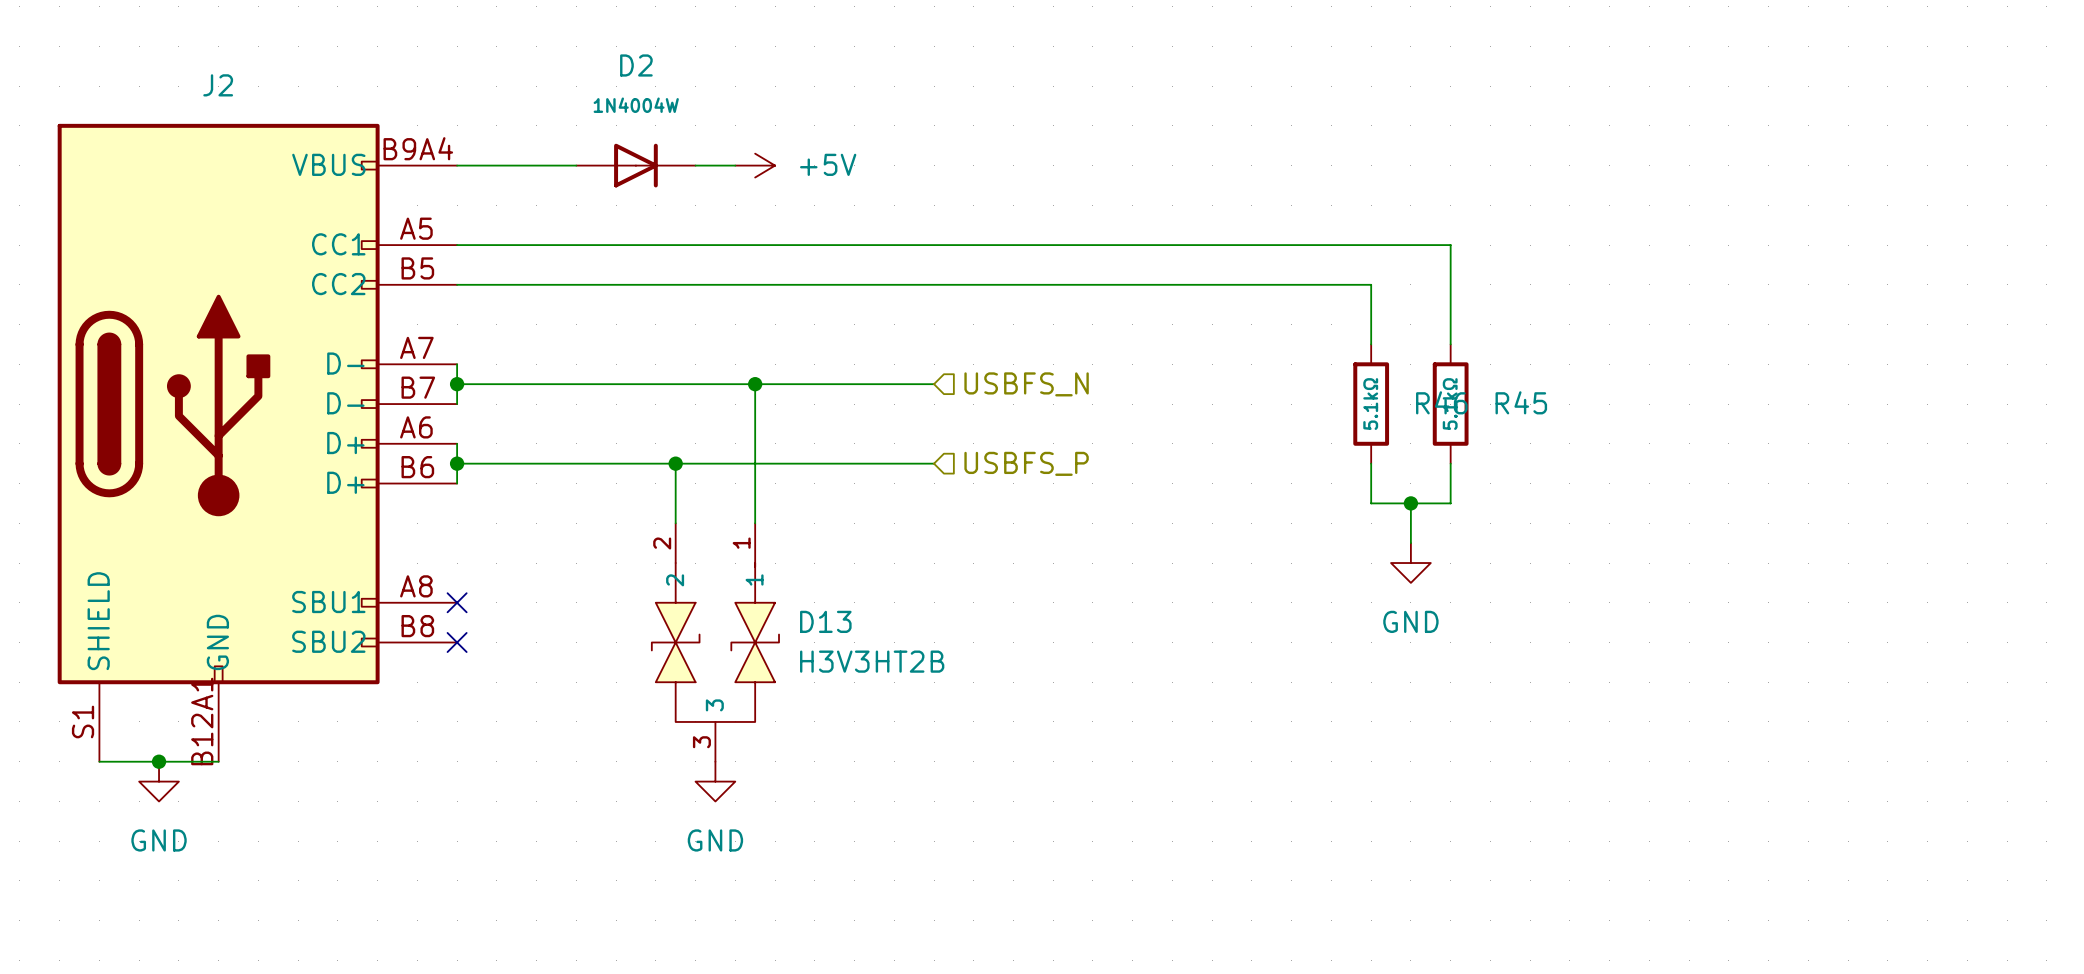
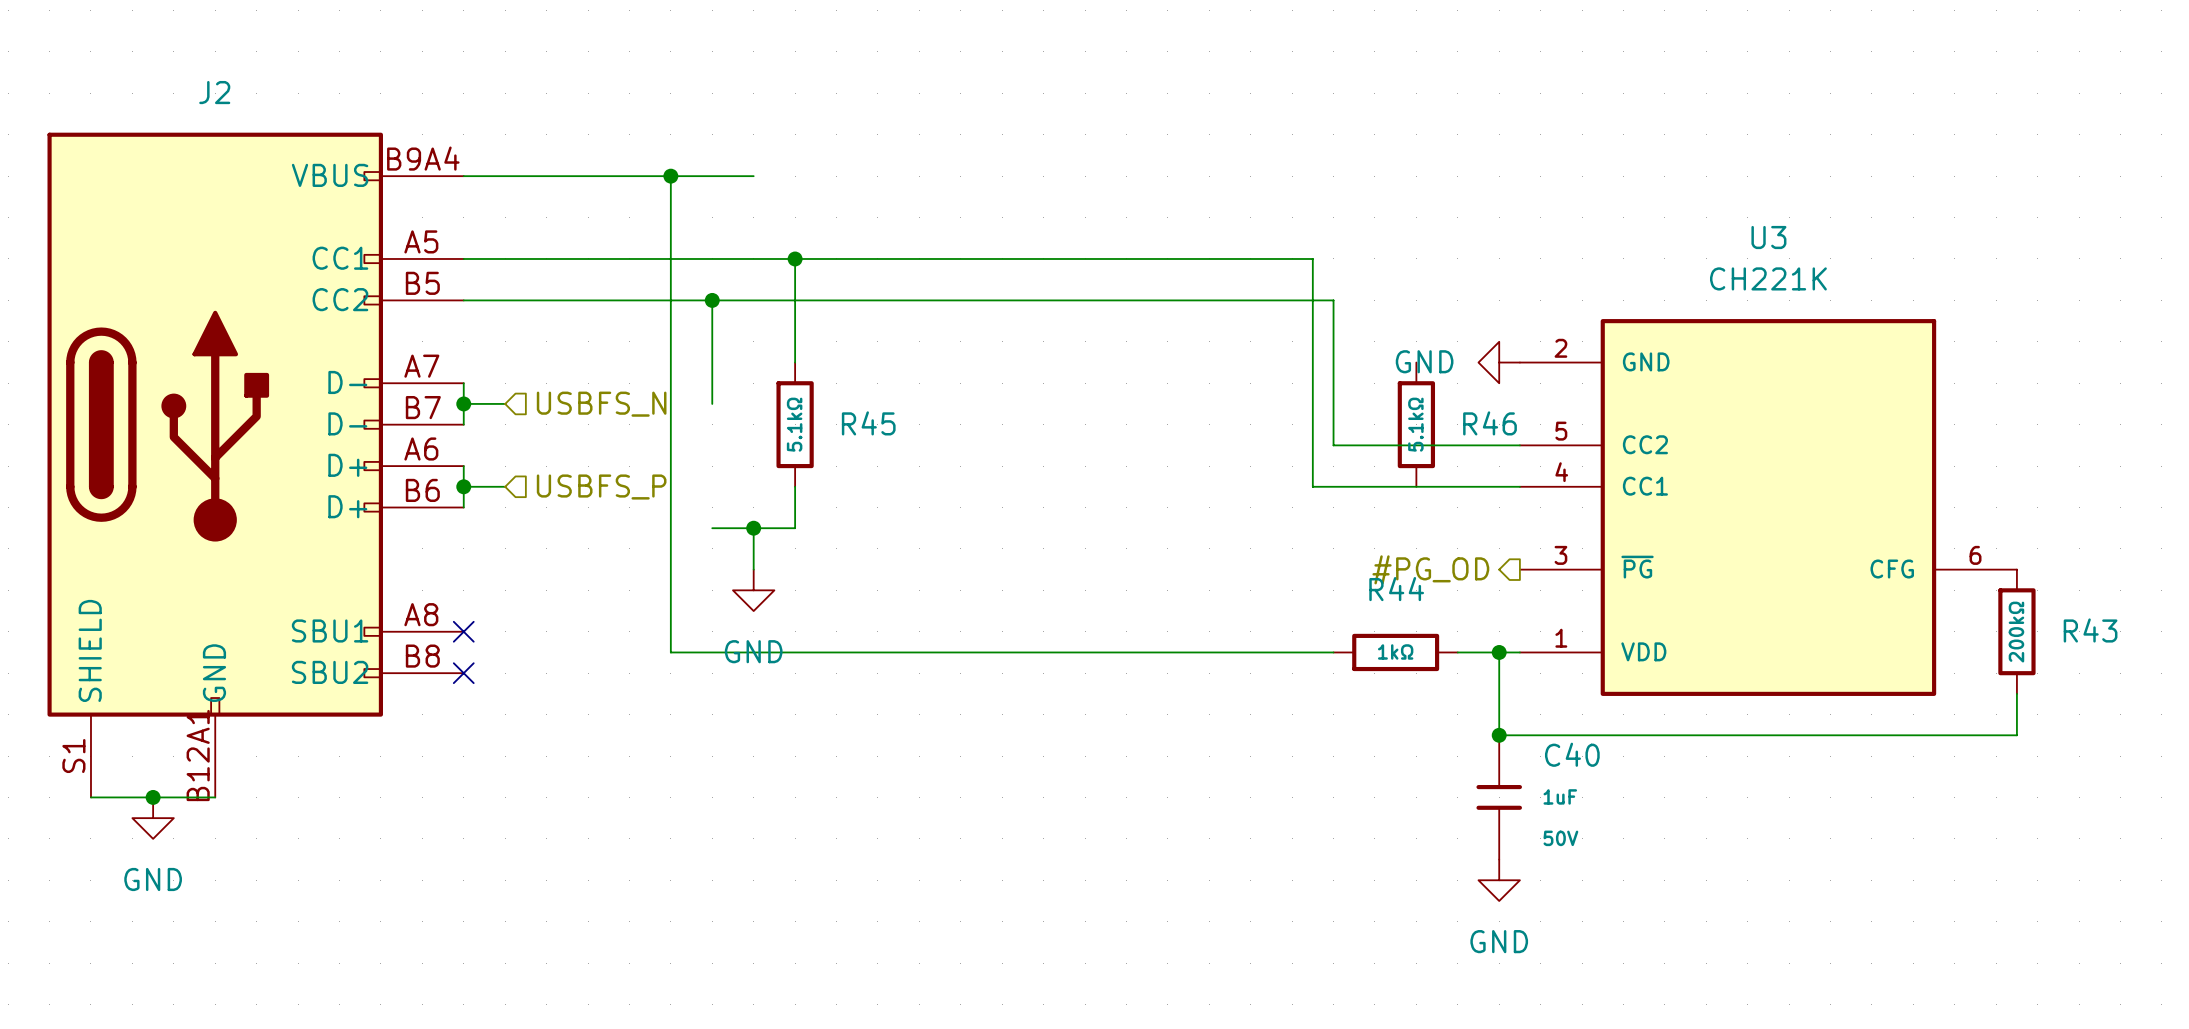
D2: 1N4004W (635, 165) -> none
wire: none -> (670, 176) (670, 652) (1333, 652)
junction: none -> (670, 176)
power symbol: +5V (755, 165) -> none
wire: none -> (795, 258) (795, 362)
junction: none -> (795, 258)
wire: (1271, 245) (1450, 245) (1450, 344) -> (1312, 258) (1312, 486) (1519, 486)
wire: none -> (712, 300) (712, 403)
junction: none -> (712, 300)
wire: (1291, 284) (1371, 284) (1371, 344) -> (1333, 300) (1333, 445) (1519, 445)
power symbol: none -> GND (1499, 362)
wire: (496, 384) (934, 384) -> none
hierarchical label: none -> USBFS_N (601, 404)
wire: (755, 384) (755, 523) -> none
junction: (755, 384) -> none
hierarchical label: USBFS_N (1026, 384) -> none
R45 position: (1450, 404) -> (795, 424)
wire: (496, 463) (934, 463) -> none
hierarchical label: none -> USBFS_P (601, 487)
wire: (675, 463) (675, 523) -> none
junction: (675, 463) -> none
wire: none -> (795, 486) (795, 528) (712, 528)
hierarchical label: USBFS_P (1026, 463) -> none
wire: (1371, 463) (1371, 503) (1450, 503) (1450, 463) -> none
U3: none -> CH221K (1768, 507)
wire: none -> (753, 528) (753, 569)
junction: none -> (753, 528)
wire: (1410, 503) (1410, 543) -> none
junction: (1410, 503) -> none
hierarchical label: none -> #PG_OD (1430, 569)
power symbol: GND (1410, 563) -> none
R43: none -> 200kΩ (2016, 631)
R44: none -> 1kΩ (1395, 652)
wire: none -> (1457, 652) (1519, 652)
wire: none -> (1499, 652) (1499, 735) (2016, 735) (2016, 693)
junction: none -> (1499, 652)
D13: H3V3HT2B (715, 642) -> none
junction: none -> (1499, 735)
C40: none -> 1uF (1499, 797)
power symbol position: GND (715, 781) -> GND (753, 590)
power symbol: none -> GND (1499, 880)

